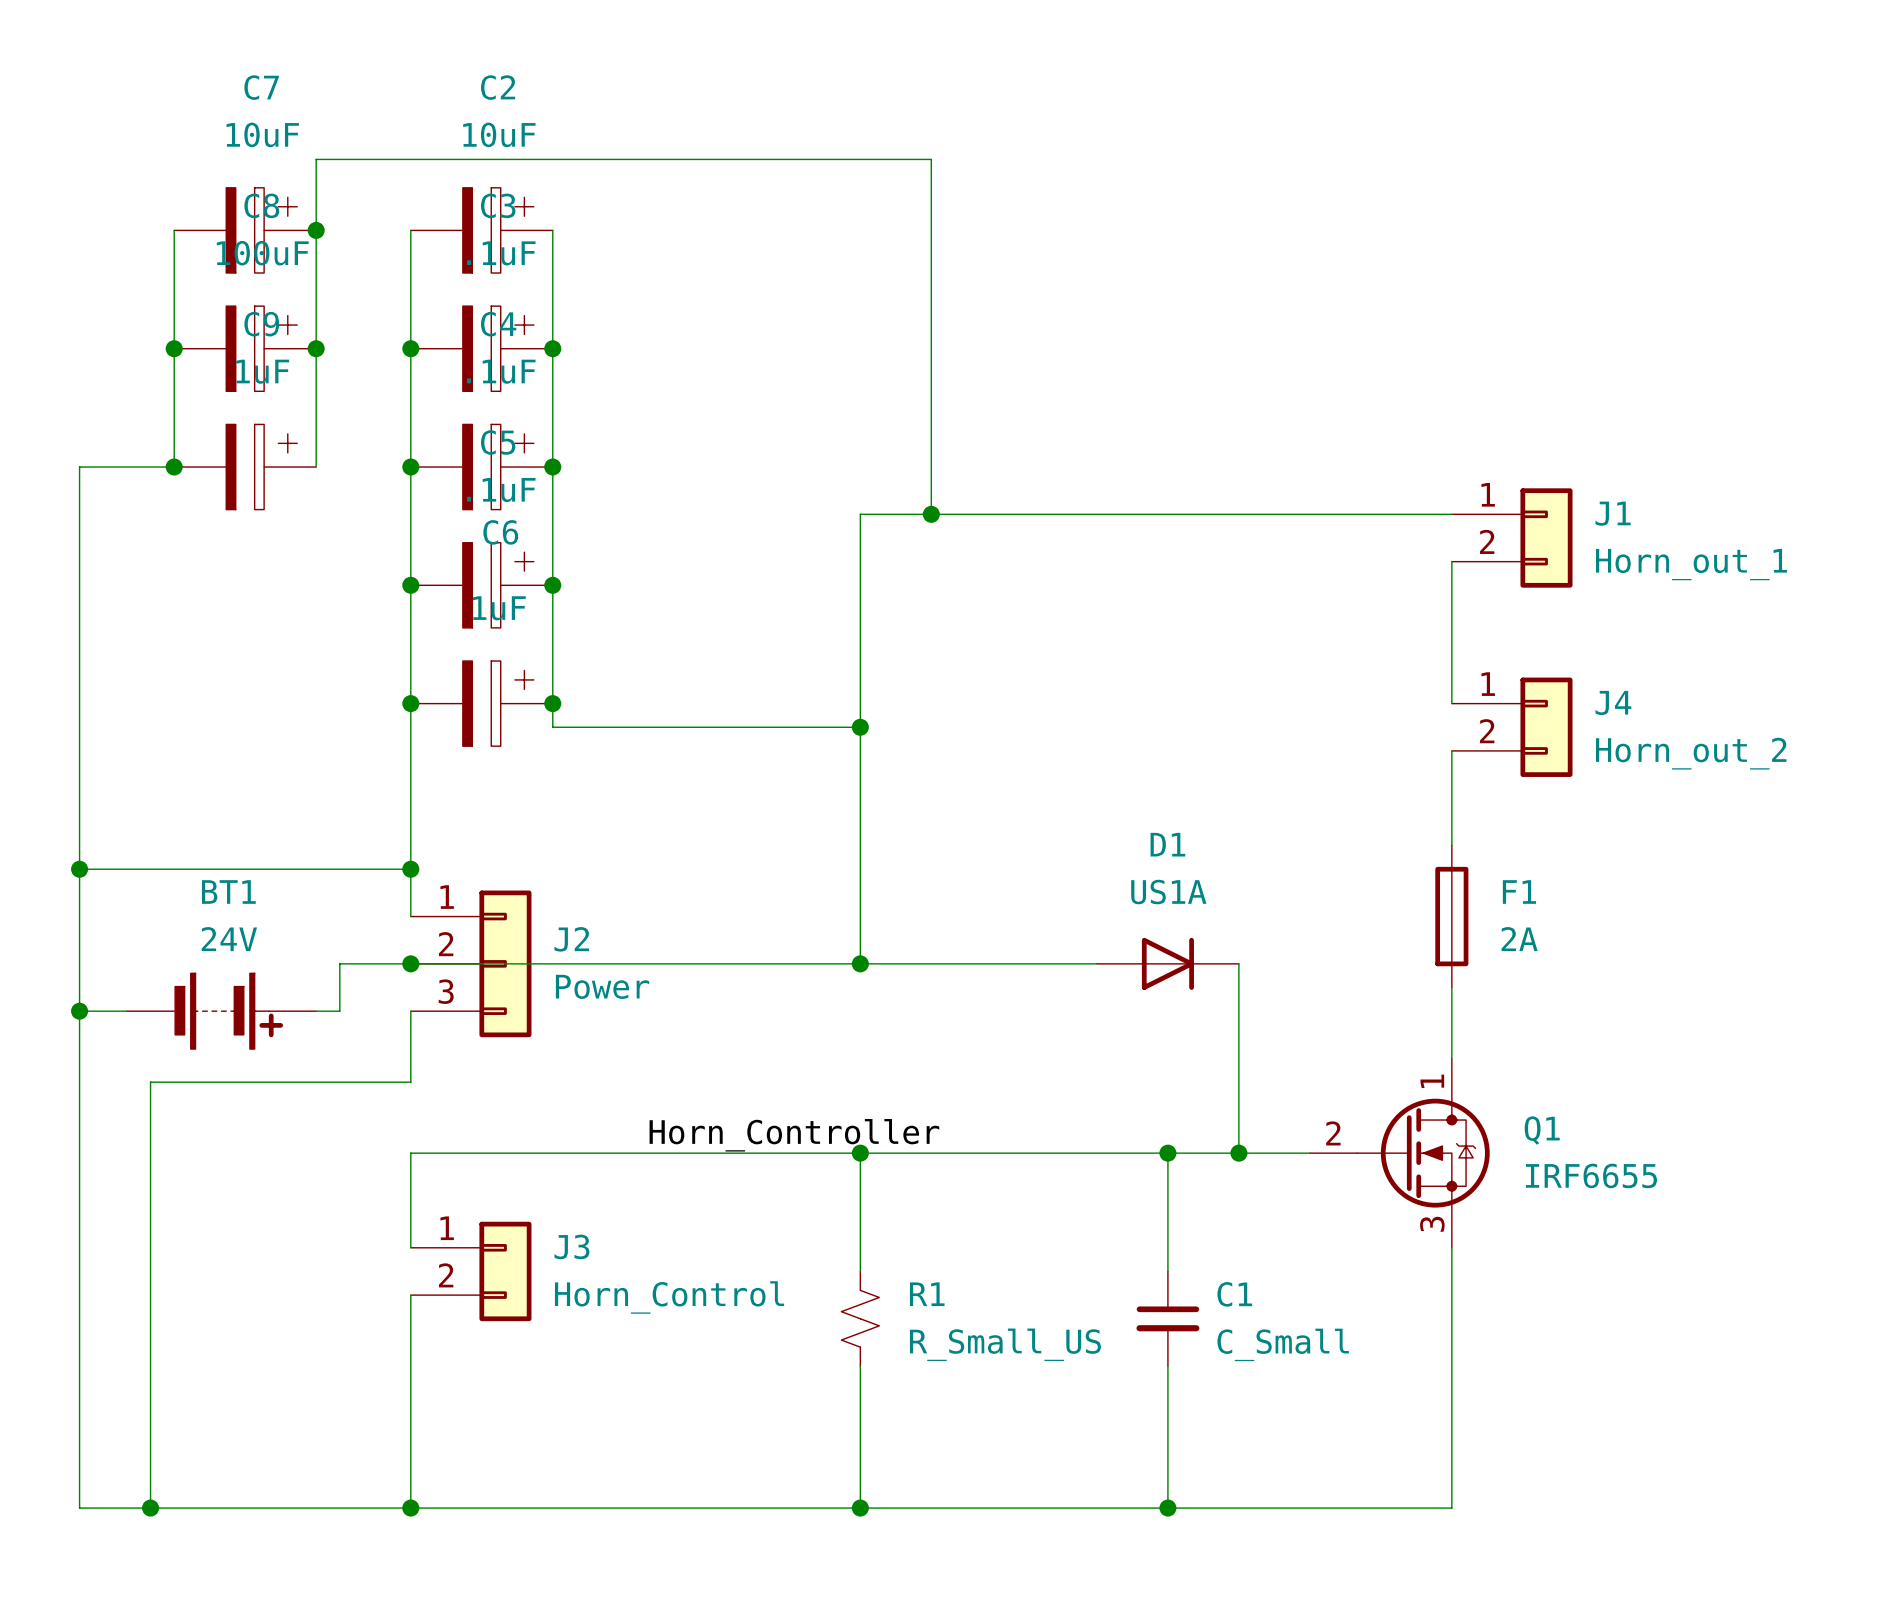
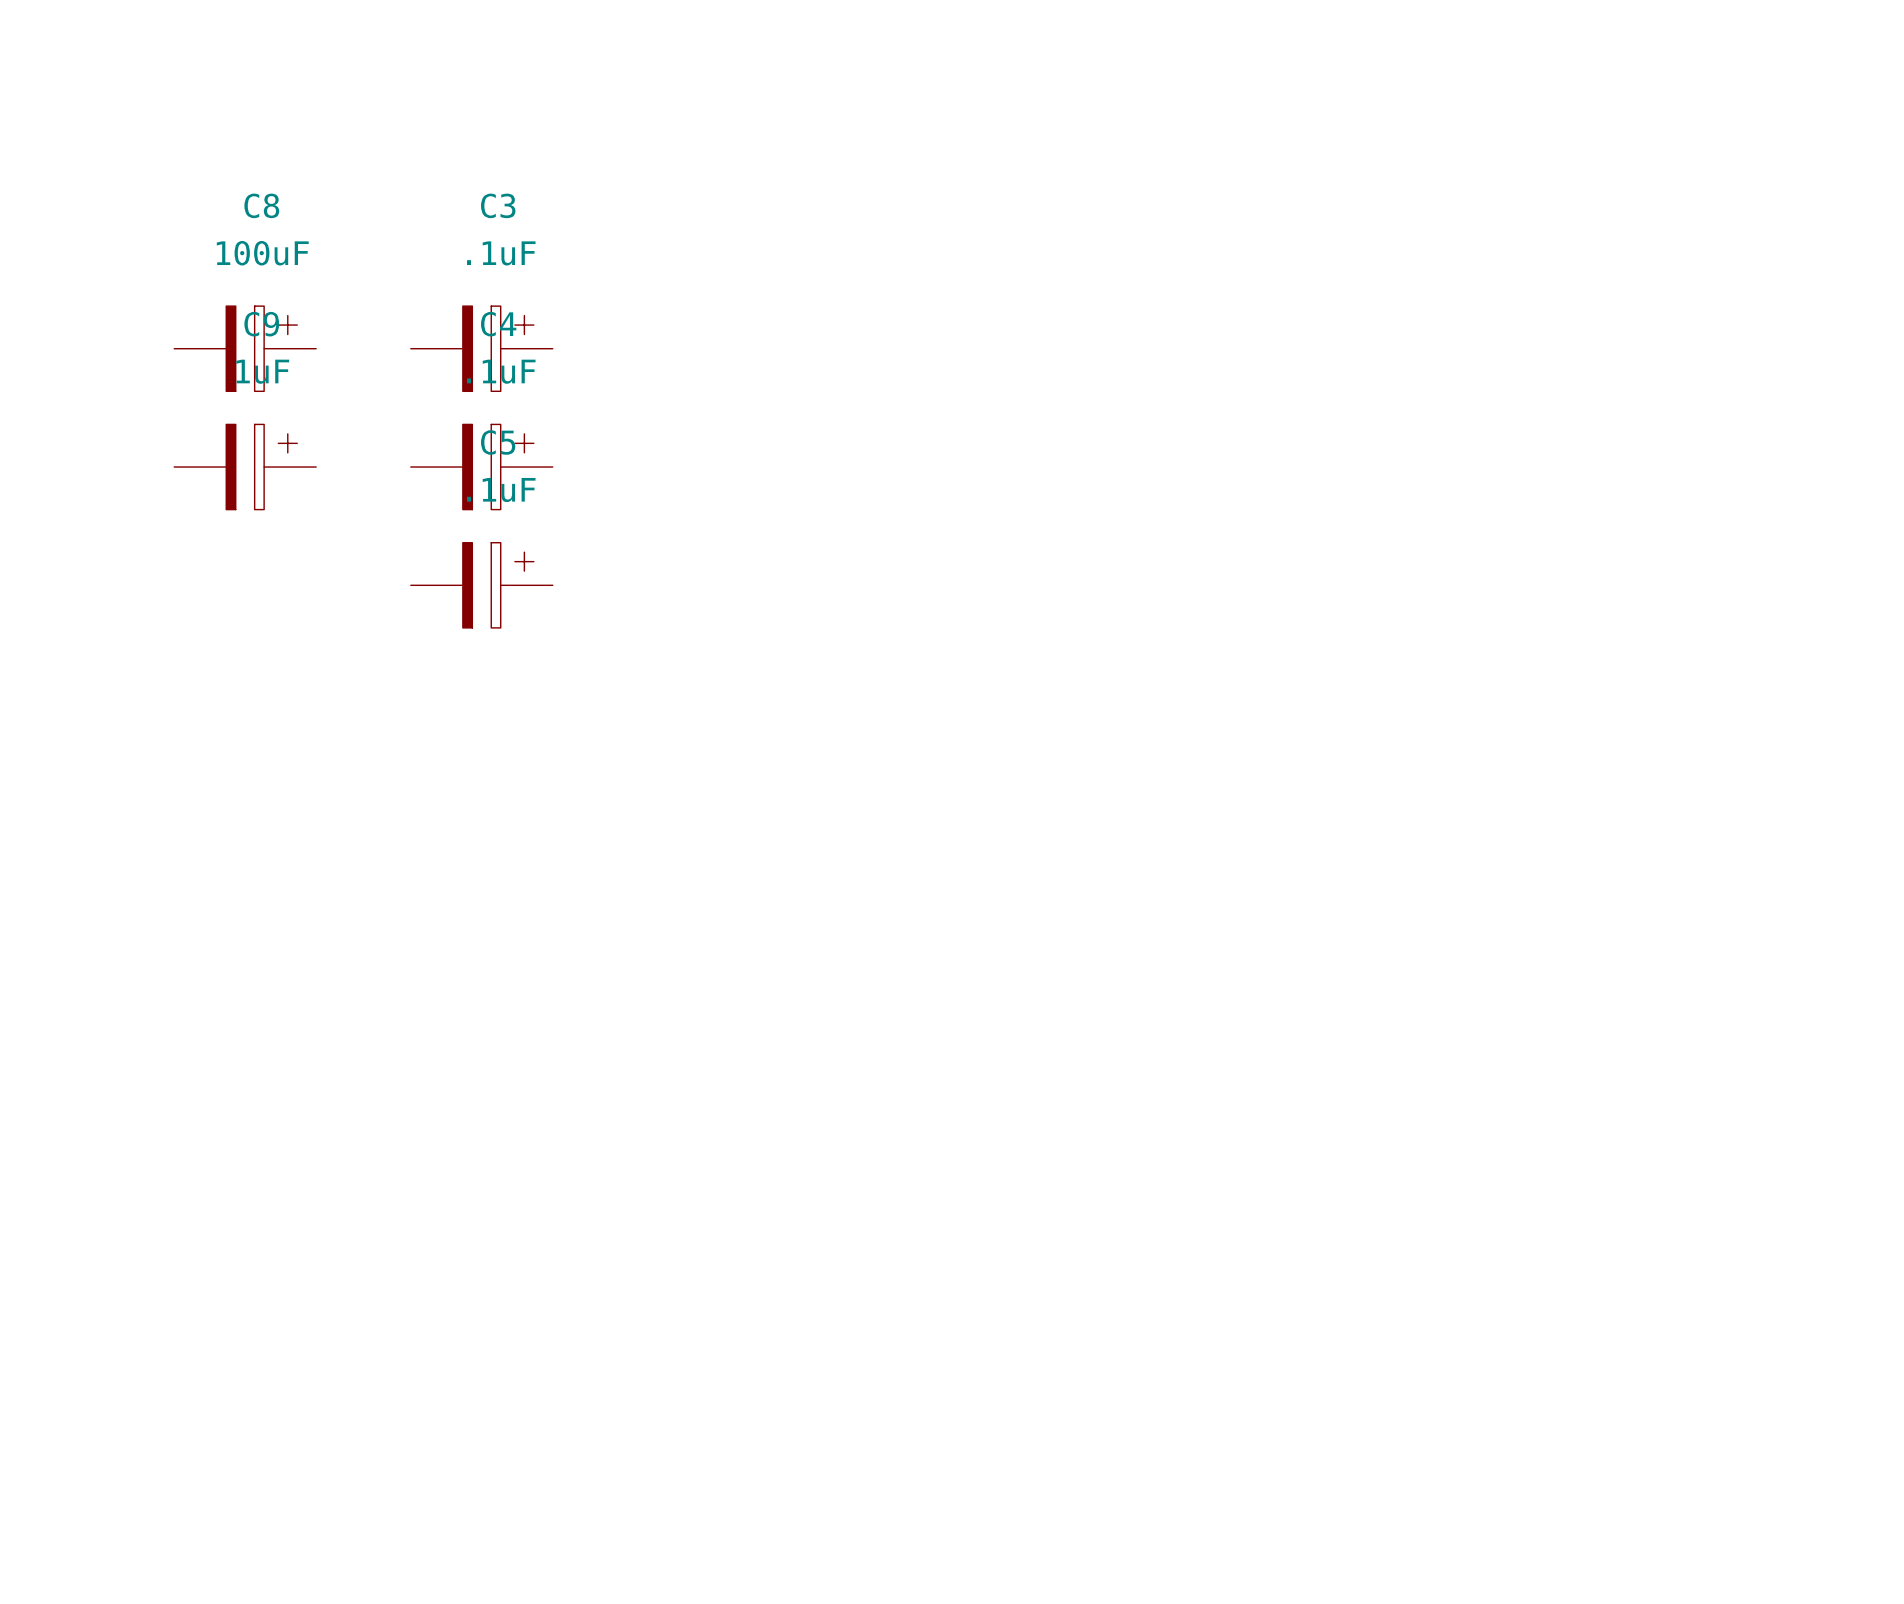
wire: (174, 230) (174, 467) (79, 467) (79, 1508) (1451, 1508) (1451, 1247) -> none
C7: 10uF (245, 230) -> none
junction: (316, 230) -> none
wire: (410, 230) (410, 916) -> none
C2: 10uF (481, 230) -> none
wire: (552, 230) (552, 727) (860, 727) -> none
junction: (174, 348) -> none
junction: (316, 348) -> none
junction: (410, 348) -> none
junction: (552, 348) -> none
junction: (174, 467) -> none
wire: (316, 467) (316, 159) (931, 159) (931, 514) -> none
junction: (410, 467) -> none
junction: (552, 467) -> none
junction: (931, 514) -> none
wire: (1451, 514) (860, 514) (860, 963) -> none
J1: Horn_out_1 (1512, 537) -> none
wire: (1451, 561) (1451, 703) -> none
junction: (410, 585) -> none
junction: (552, 585) -> none
junction: (410, 703) -> none
C6: 1uF (481, 703) -> none
junction: (552, 703) -> none
junction: (860, 727) -> none
J4: Horn_out_2 (1512, 727) -> none
wire: (1451, 750) (1451, 845) -> none
wire: (79, 869) (410, 869) -> none
junction: (79, 869) -> none
junction: (410, 869) -> none
F1: 2A (1451, 916) -> none
junction: (410, 963) -> none
J2: Power (471, 963) -> none
junction: (860, 963) -> none
wire: (1096, 963) (339, 963) (339, 1011) (316, 1011) -> none
D1: US1A (1167, 963) -> none
wire: (1238, 963) (1238, 1153) -> none
wire: (1451, 987) (1451, 1058) -> none
wire: (79, 1011) (126, 1011) -> none
junction: (79, 1011) -> none
BT1: 24V (221, 1011) -> none
wire: (410, 1011) (410, 1082) (150, 1082) (150, 1508) -> none
label: Horn_Controller (794, 1135) -> none
wire: (860, 1153) (860, 1271) -> none
junction: (860, 1153) -> none
wire: (1167, 1153) (1167, 1271) -> none
junction: (1167, 1153) -> none
junction: (1238, 1153) -> none
wire: (1309, 1153) (410, 1153) (410, 1247) -> none
Q1: IRF6655 (1399, 1153) -> none
J3: Horn_Control (471, 1271) -> none
wire: (410, 1295) (410, 1508) -> none
R1: R_Small_US (860, 1318) -> none
C1: C_Small (1167, 1318) -> none
wire: (860, 1366) (860, 1508) -> none
wire: (1167, 1366) (1167, 1508) -> none
junction: (150, 1508) -> none
junction: (410, 1508) -> none
junction: (860, 1508) -> none
junction: (1167, 1508) -> none

